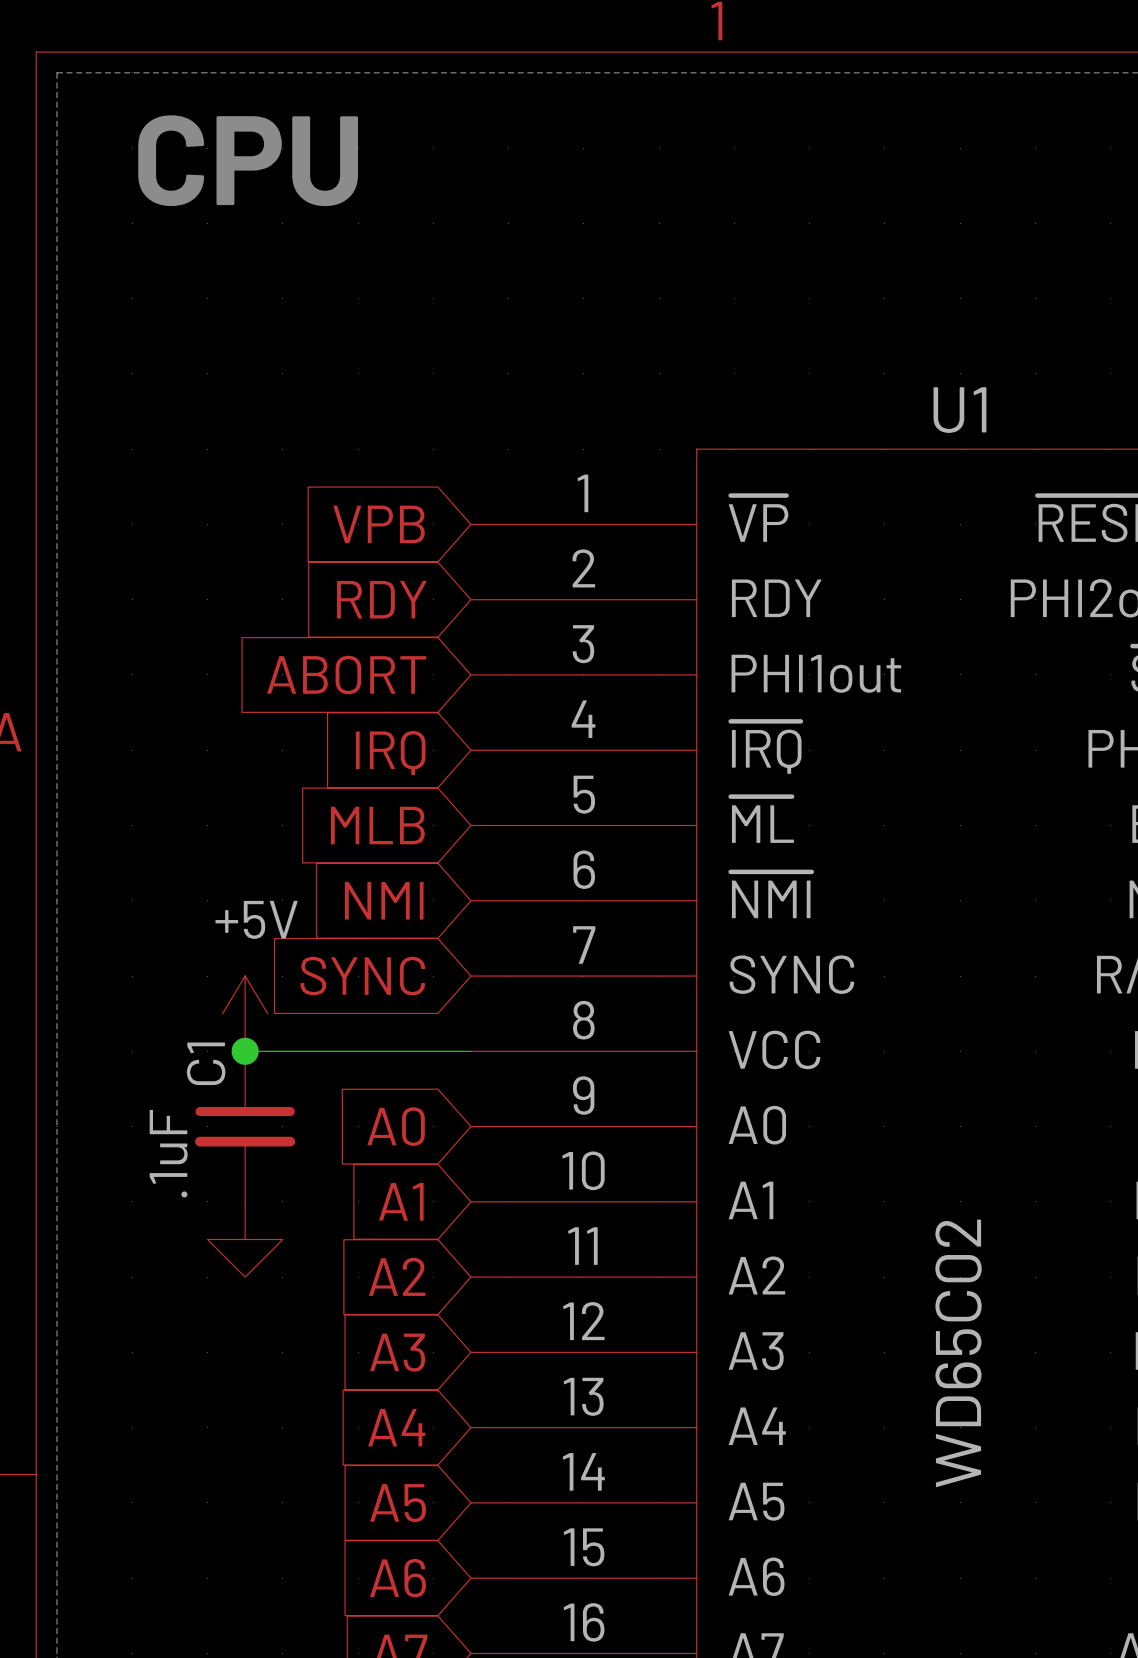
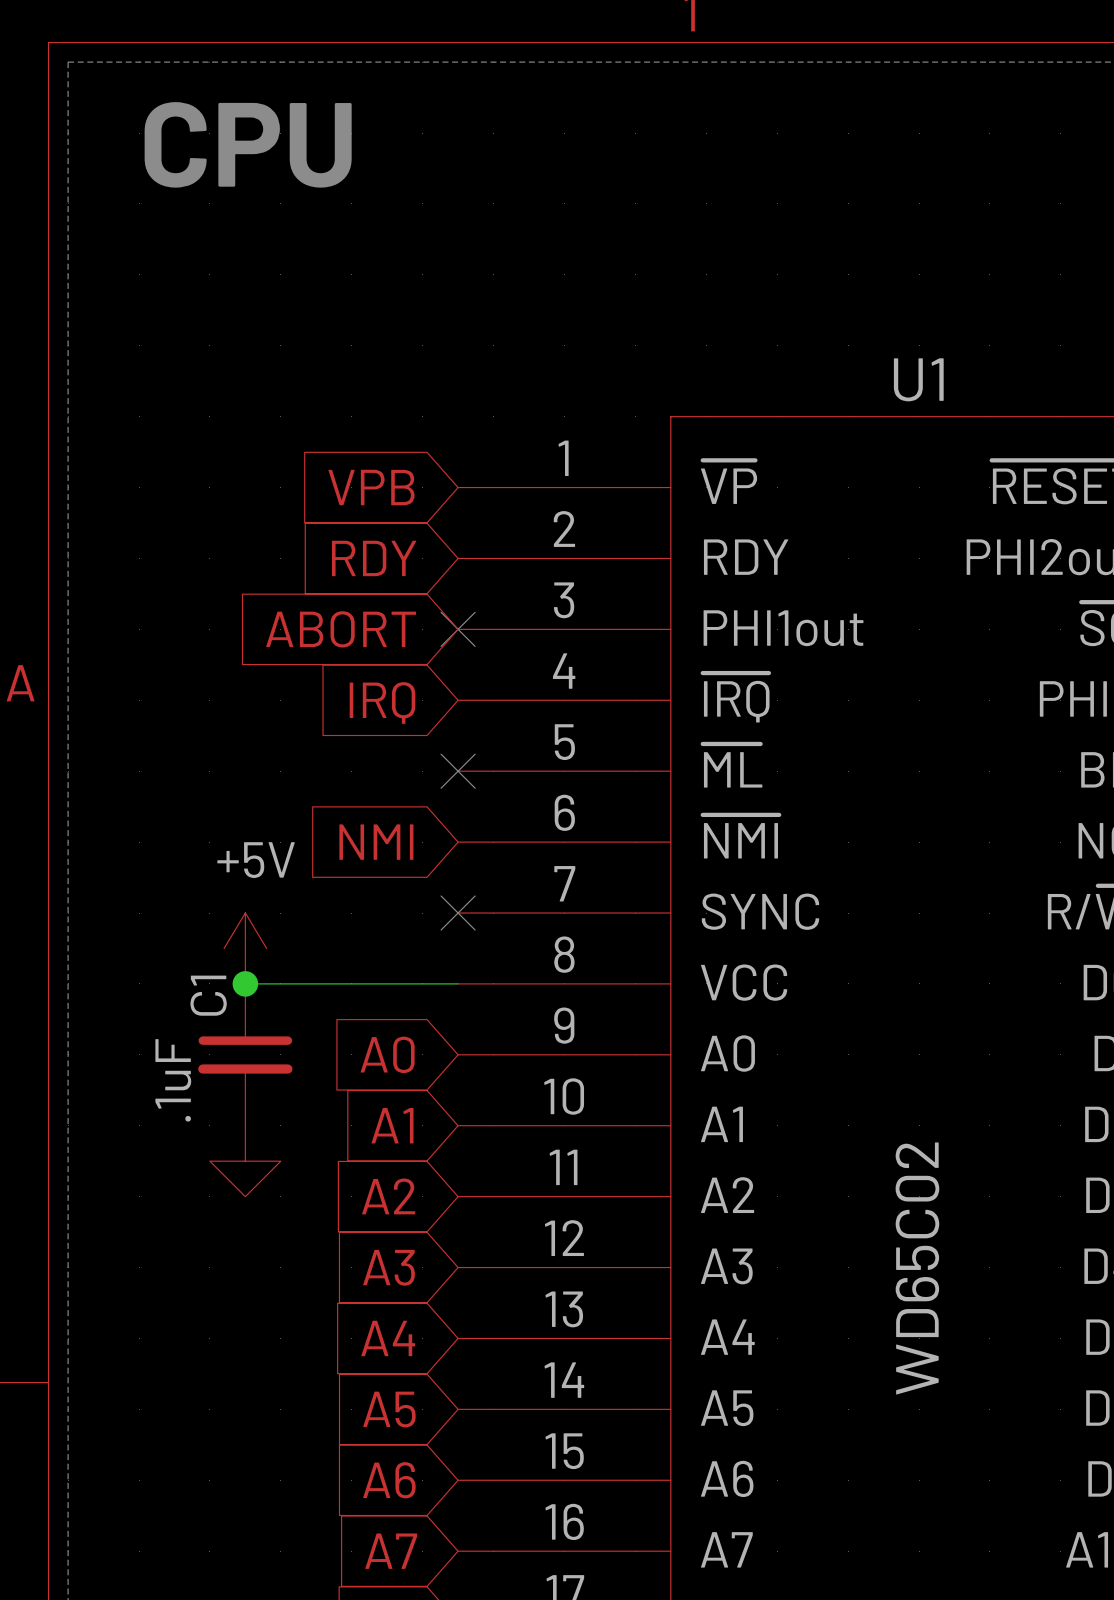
no-connect mark: none -> (458, 629)
global label: MLB (377, 825) -> none
no-connect mark: none -> (458, 771)
global label: SYNC (362, 976) -> none
no-connect mark: none -> (458, 913)

